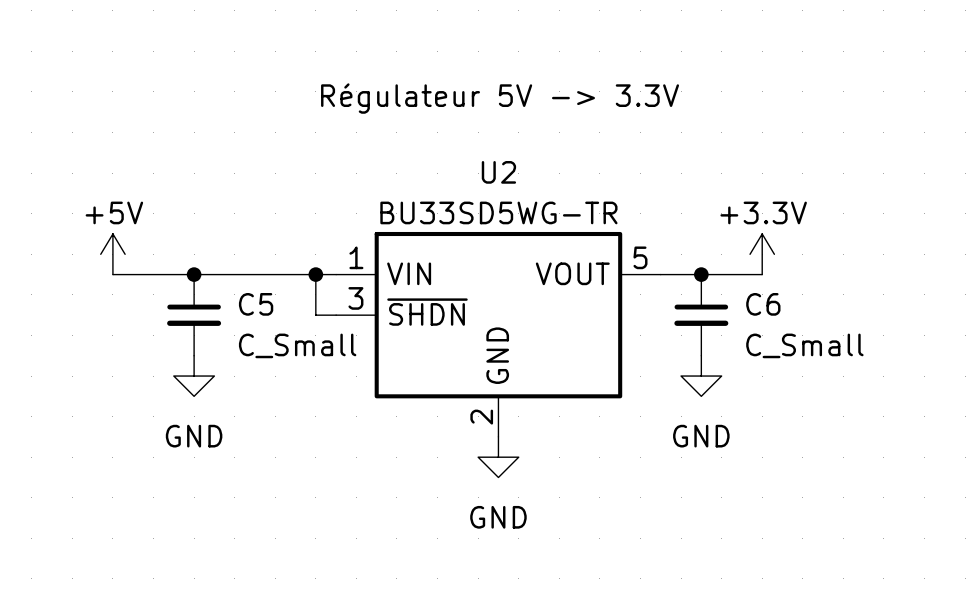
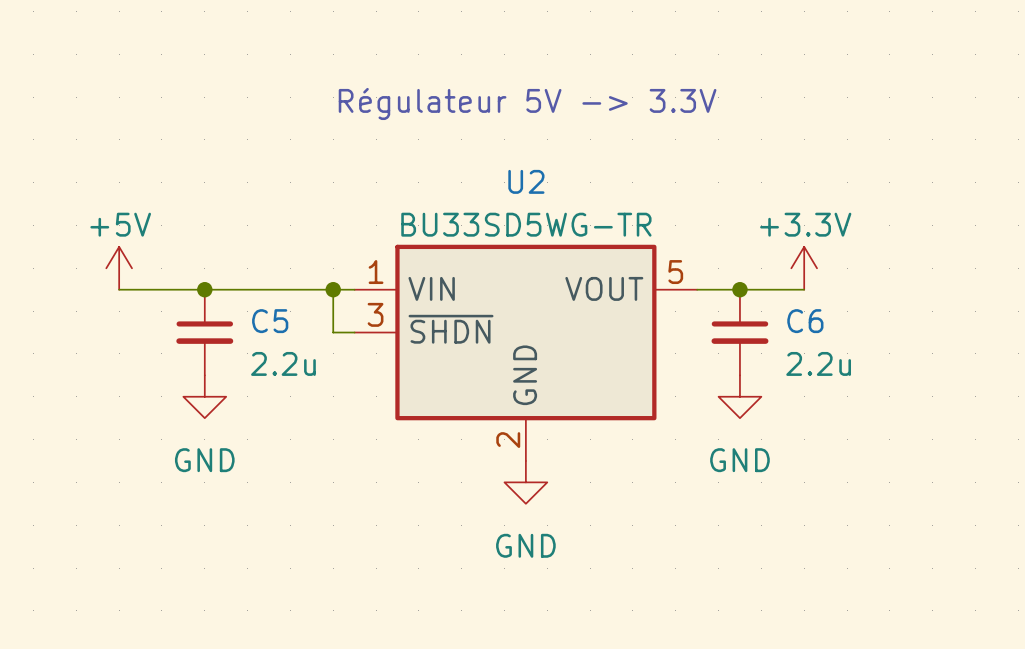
C5 value: C_Small (297, 345) -> 2.2u (283, 363)
C6 value: C_Small (804, 345) -> 2.2u (818, 363)

